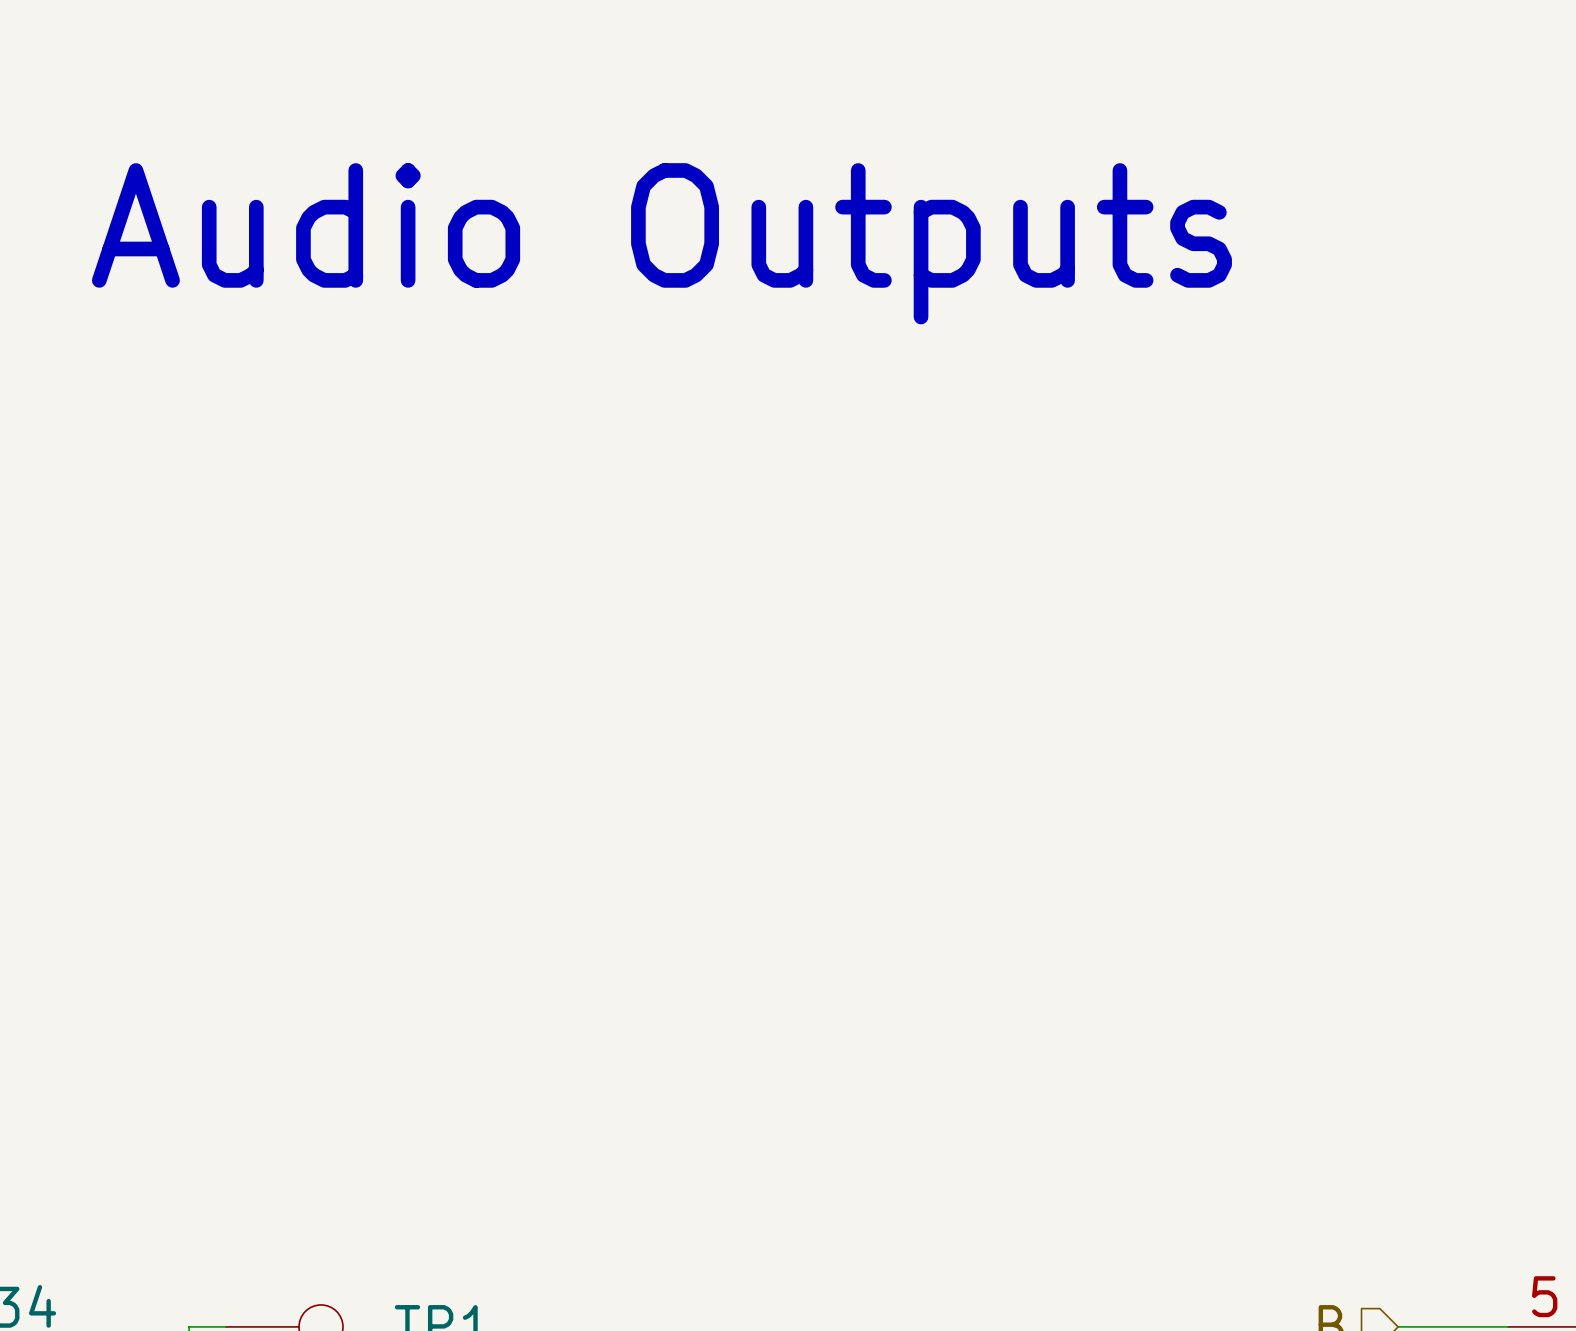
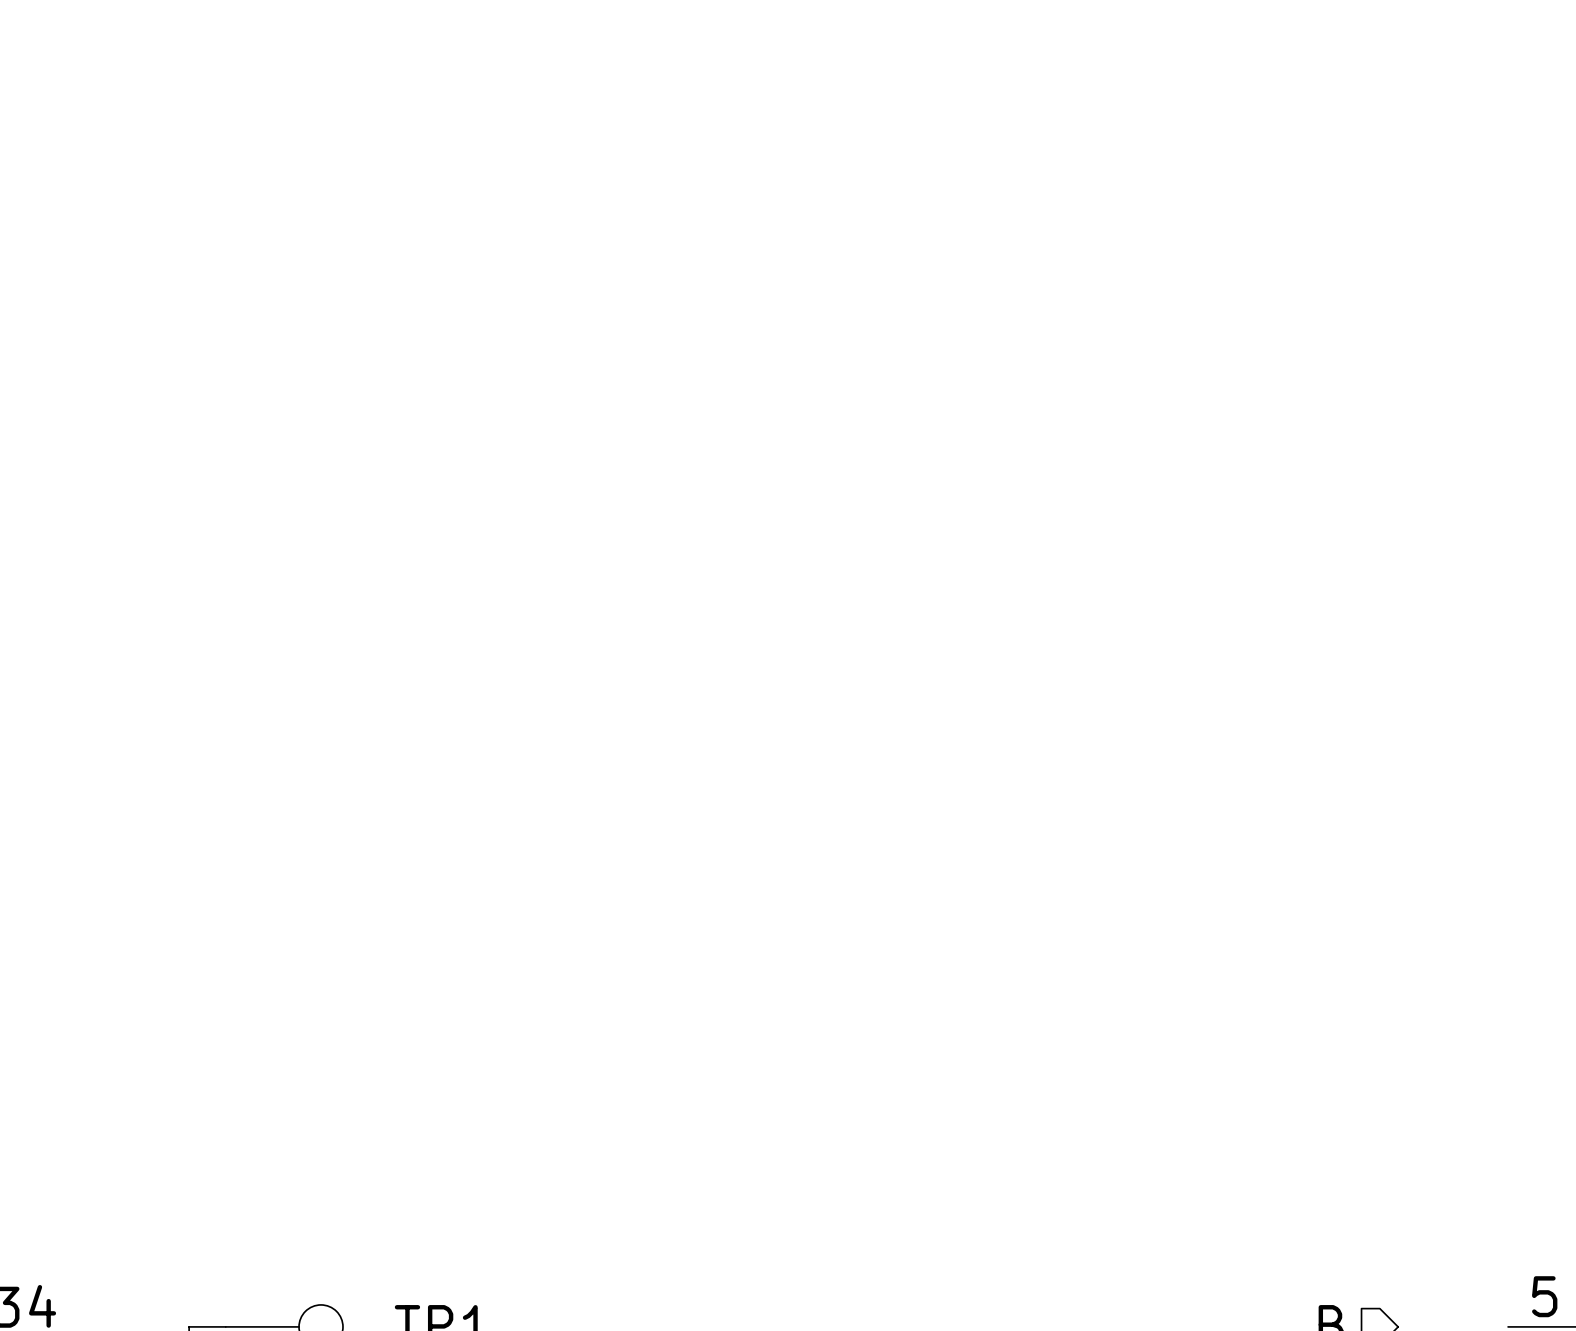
text: Audio Outputs (661, 243) -> none
wire: (1398, 1326) (1508, 1326) -> none

